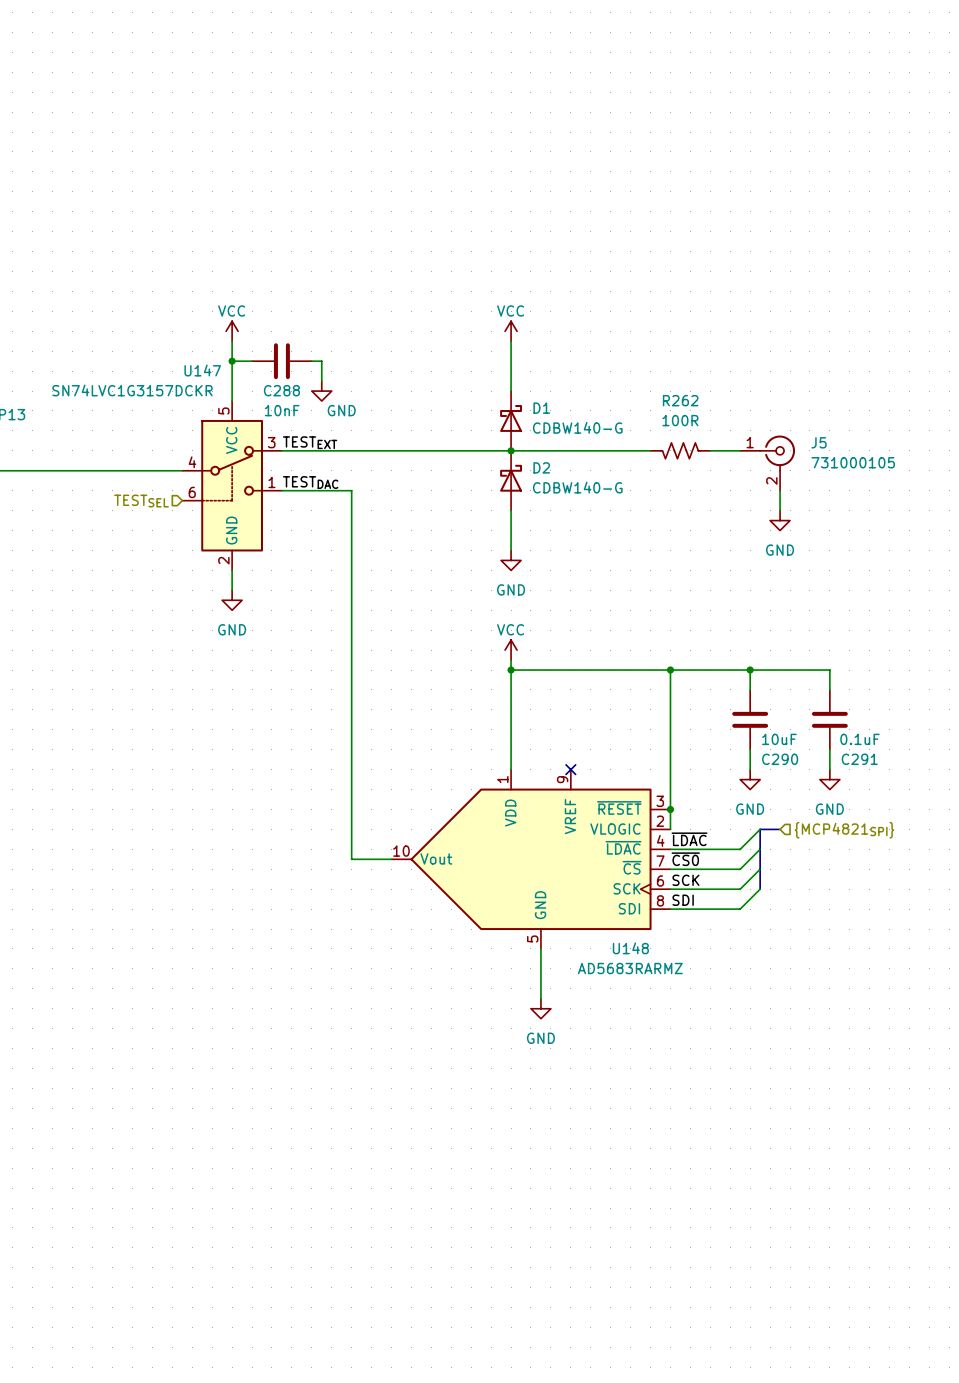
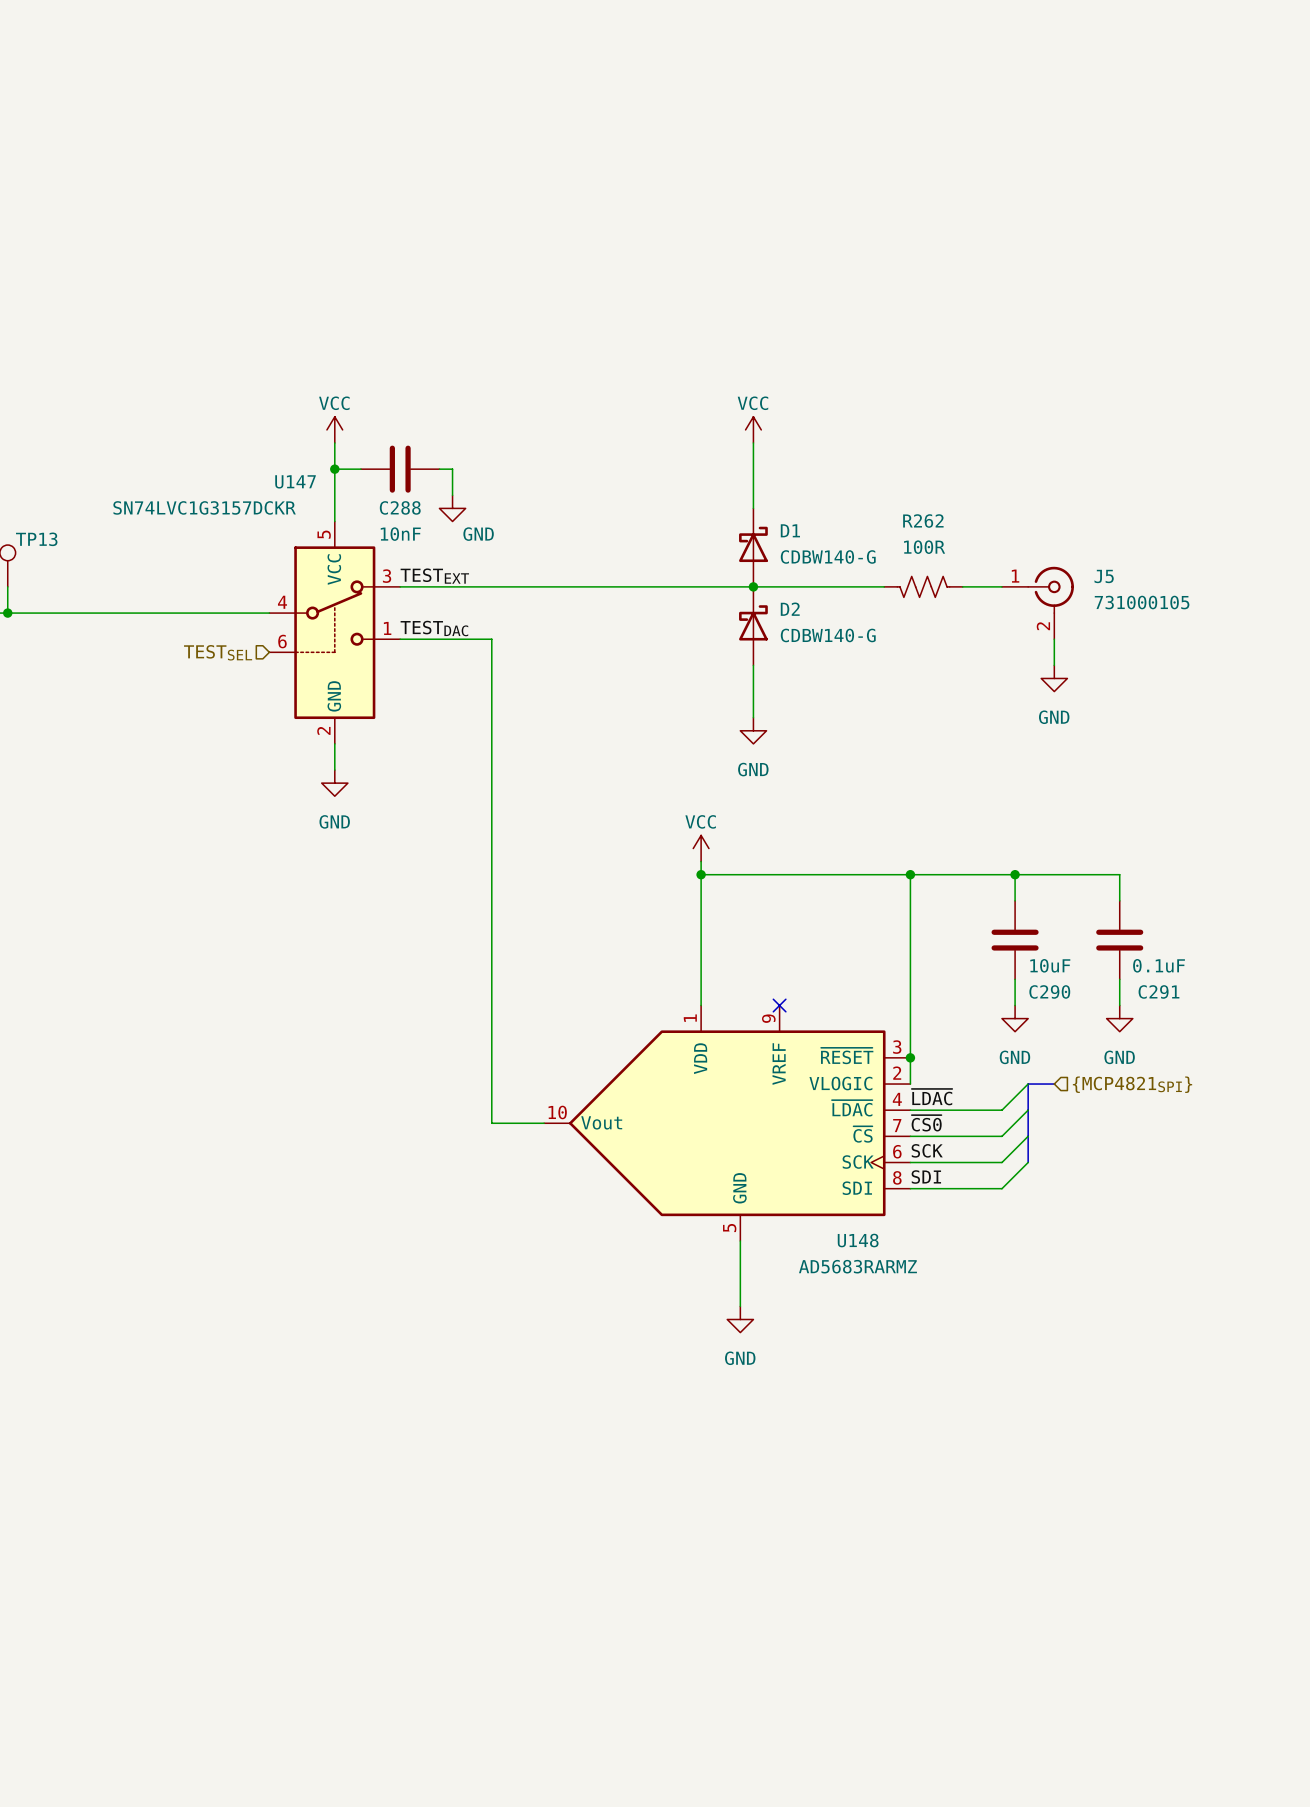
power symbol position: VCC (511, 331) -> VCC (753, 429)
wire: (511, 341) (511, 391) -> (753, 442) (753, 508)
D1 position: (511, 420) -> (753, 547)
junction position: (511, 450) -> (753, 586)
D2 position: (511, 480) -> (753, 626)
wire: (511, 510) (511, 550) -> (753, 665) (753, 717)
power symbol position: GND (511, 560) -> GND (753, 730)

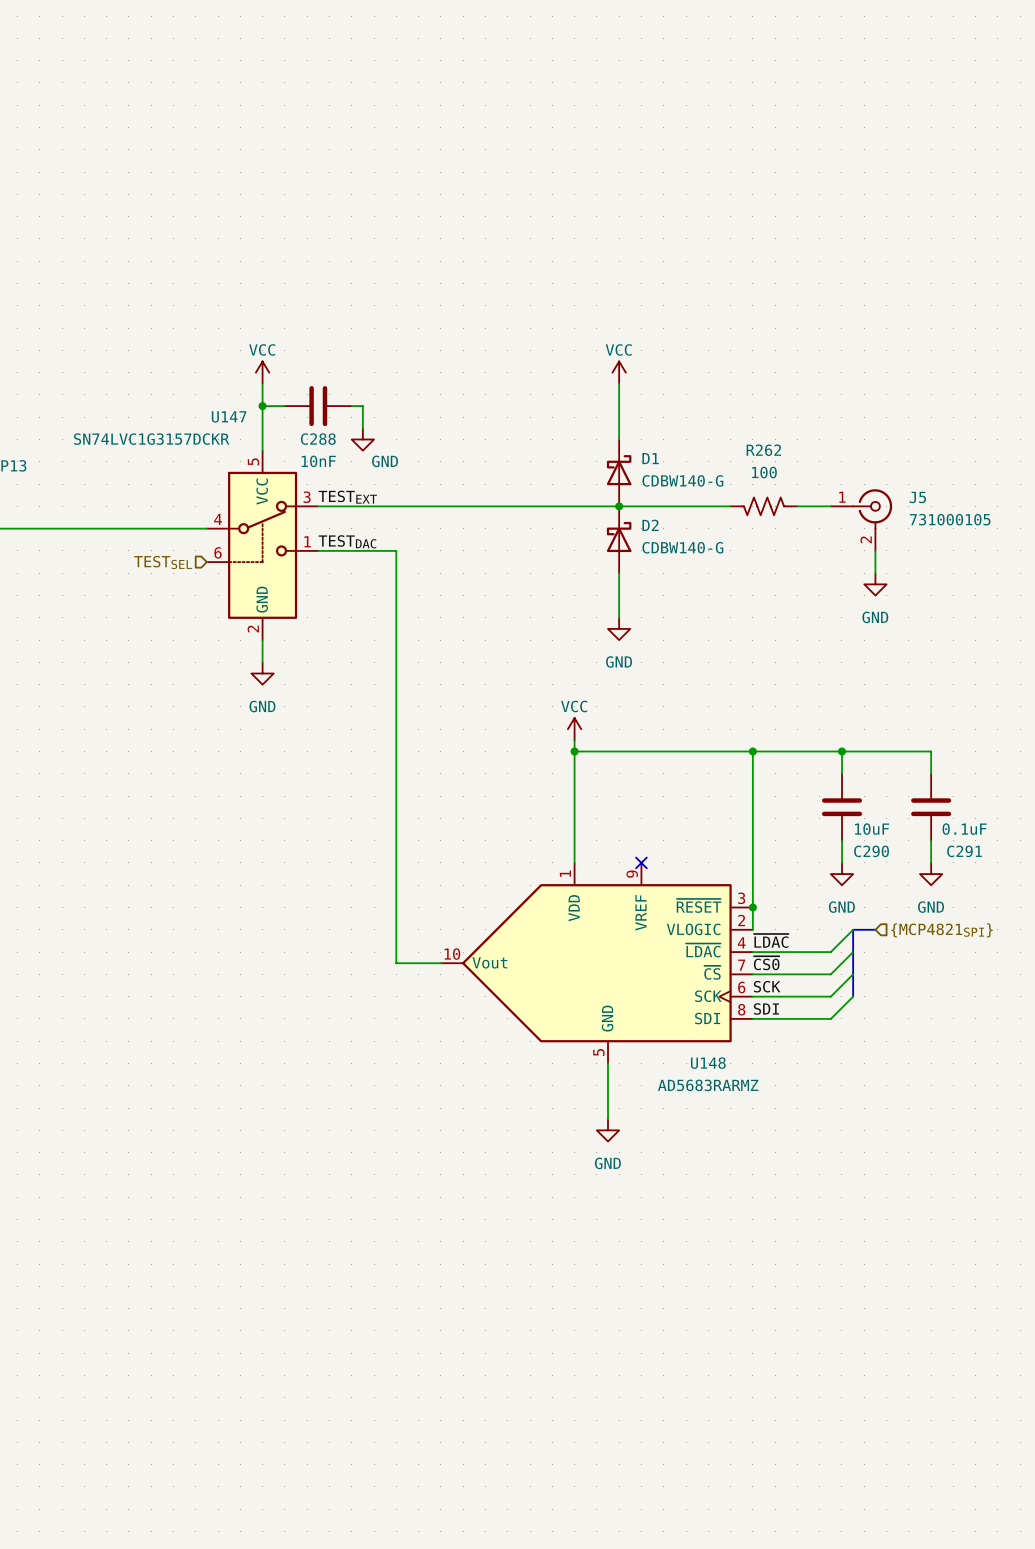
R262 value: 100R (924, 547) -> 100 (764, 472)

